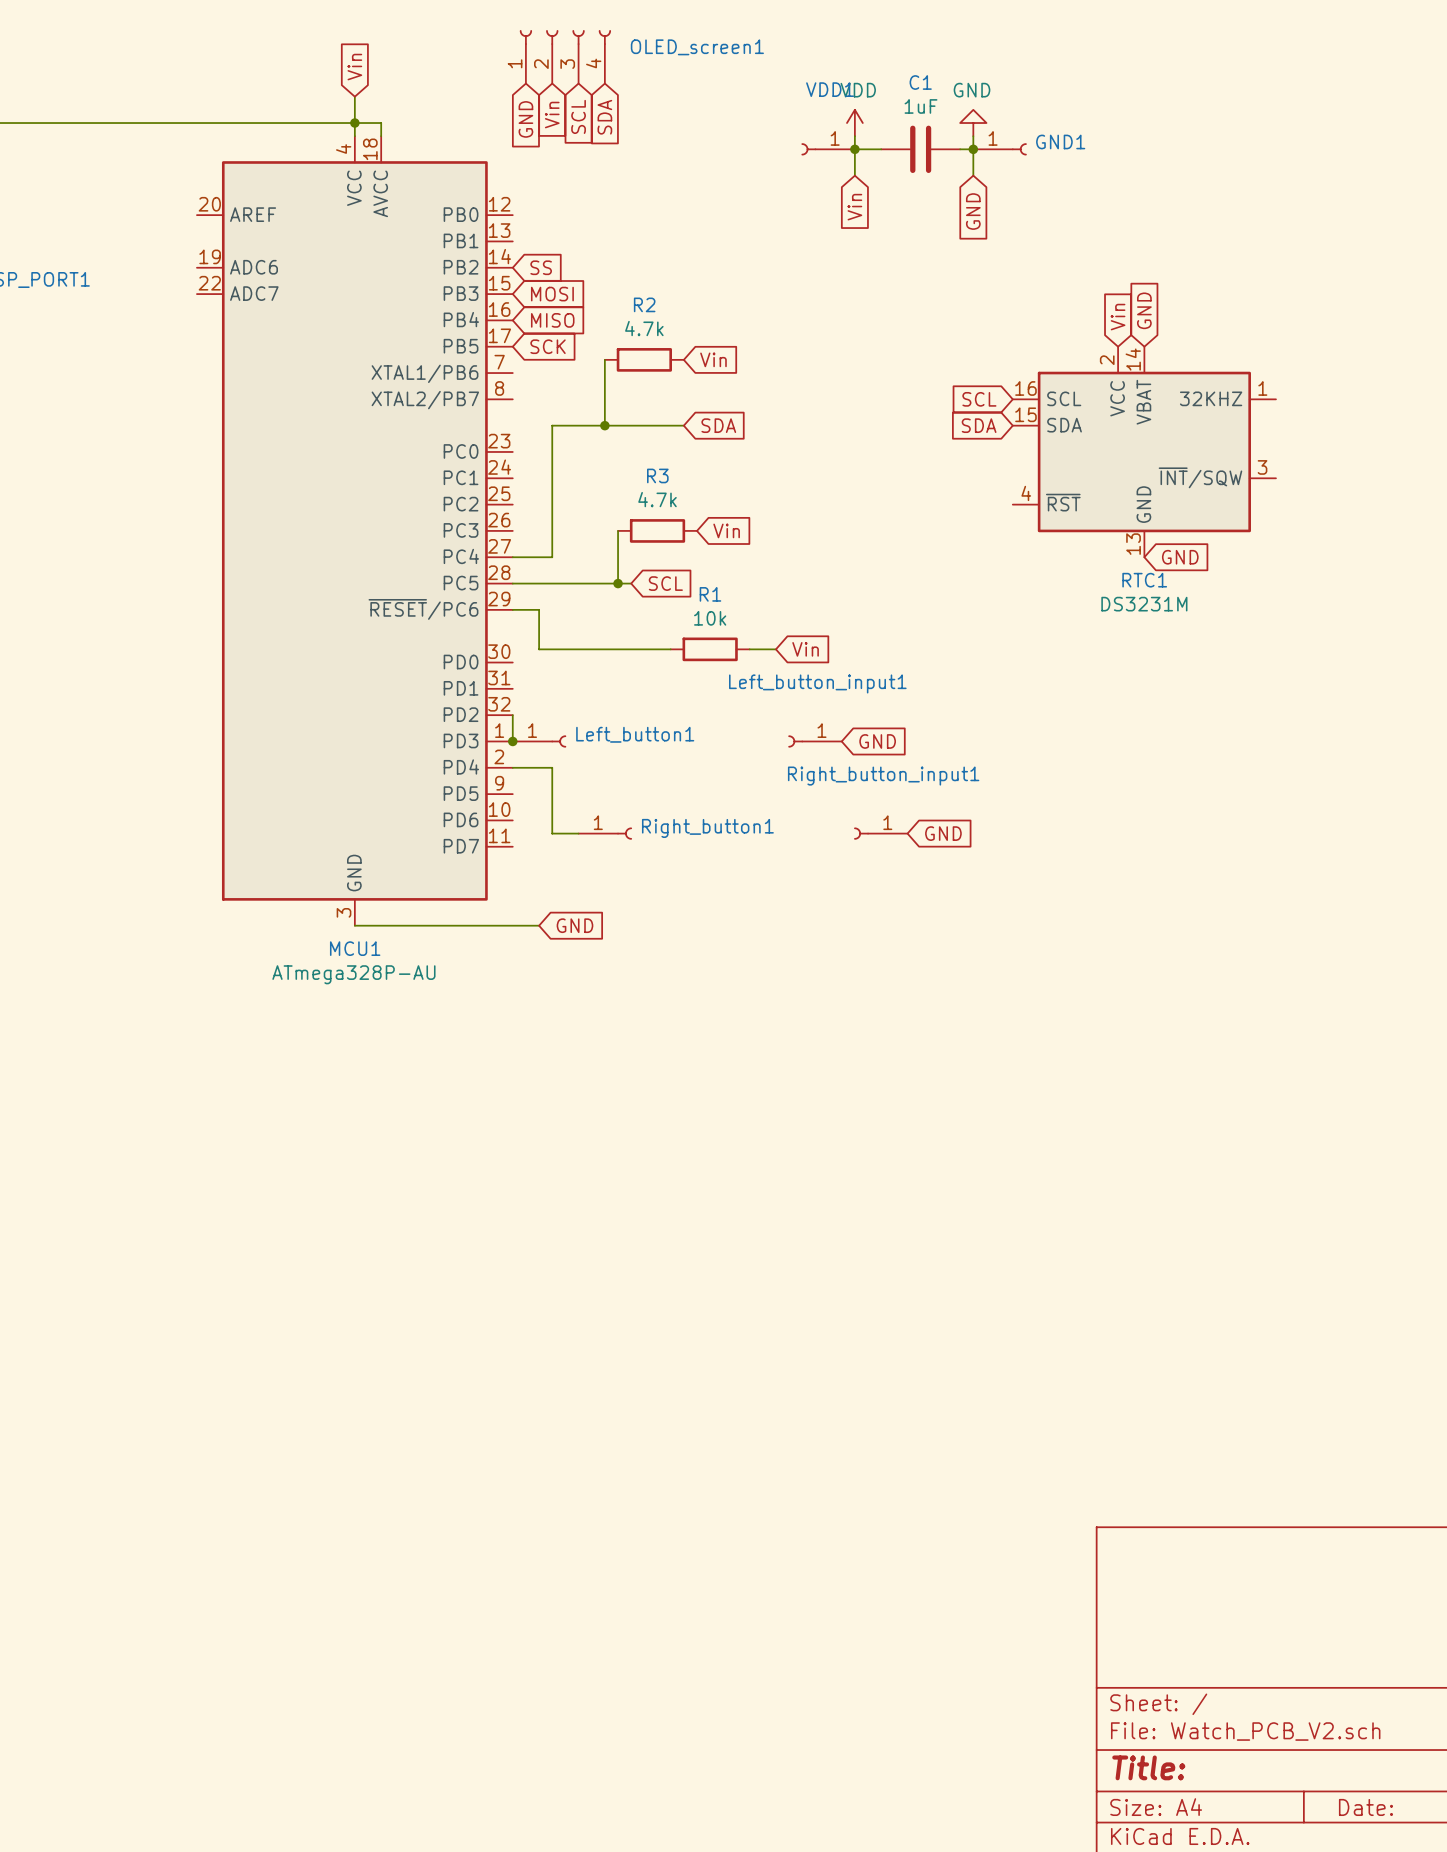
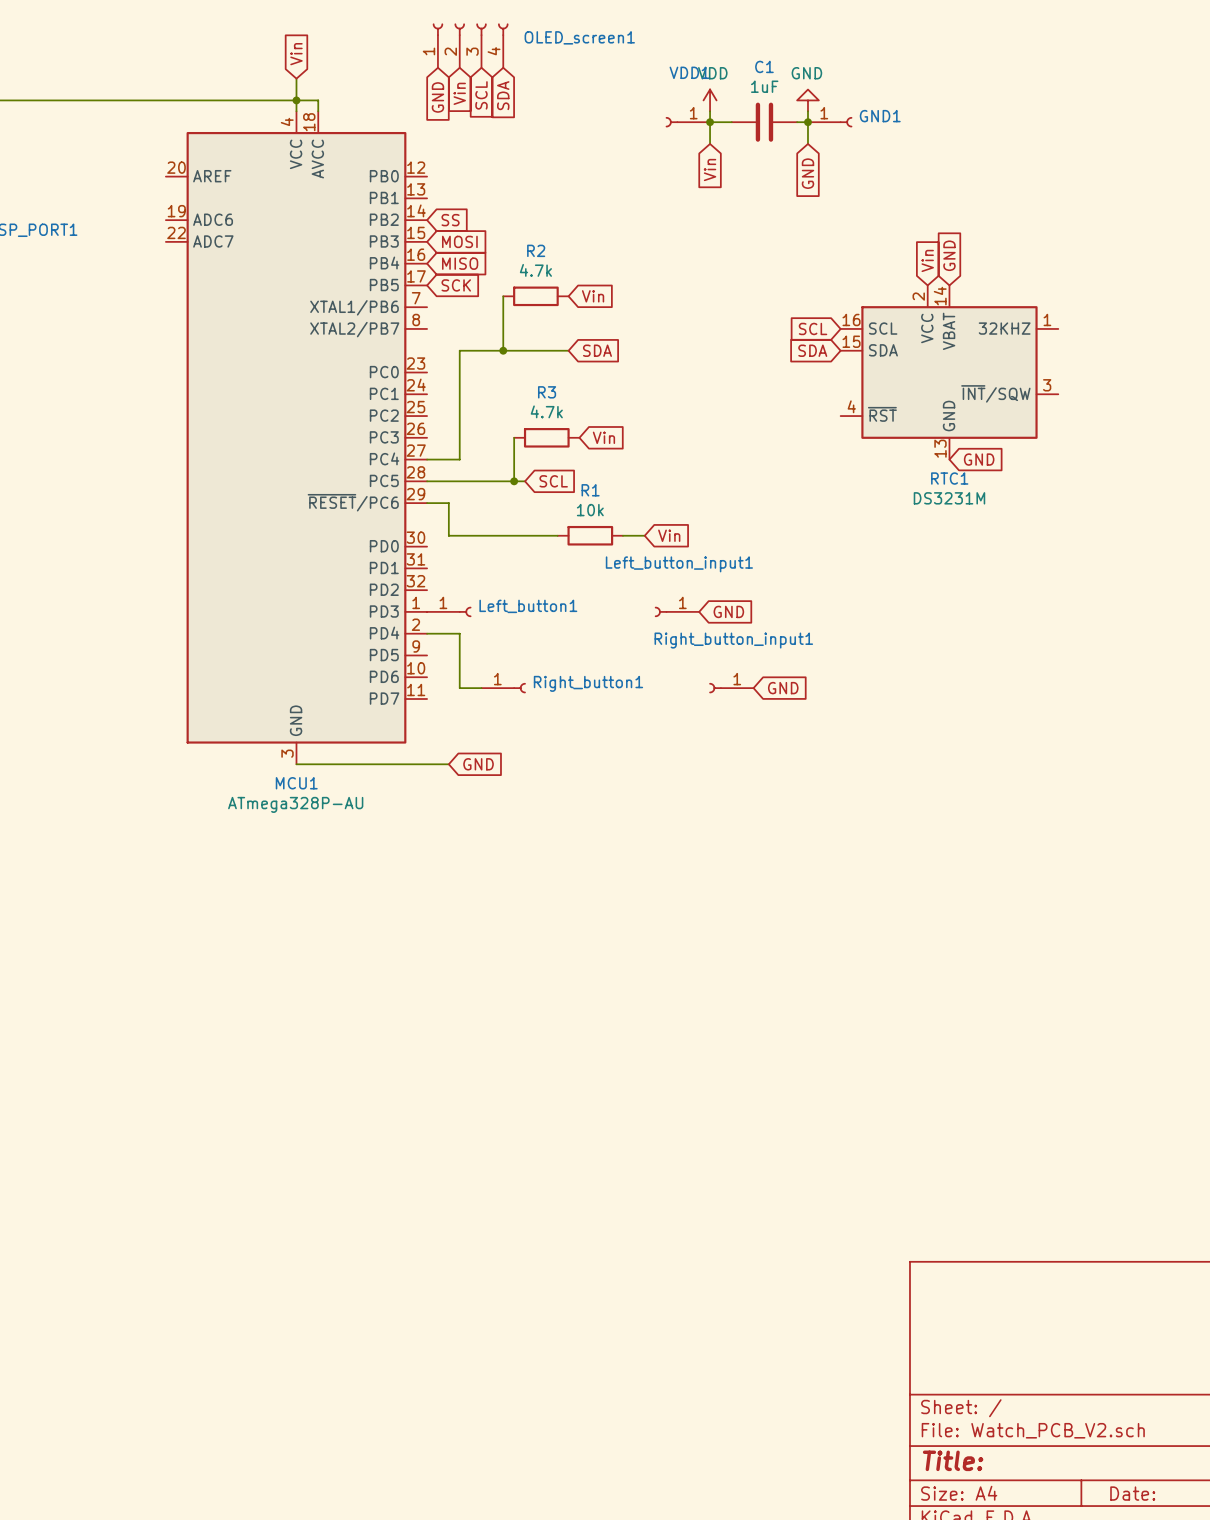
wire: (512, 715) (512, 741) -> none
junction: (512, 741) -> none

